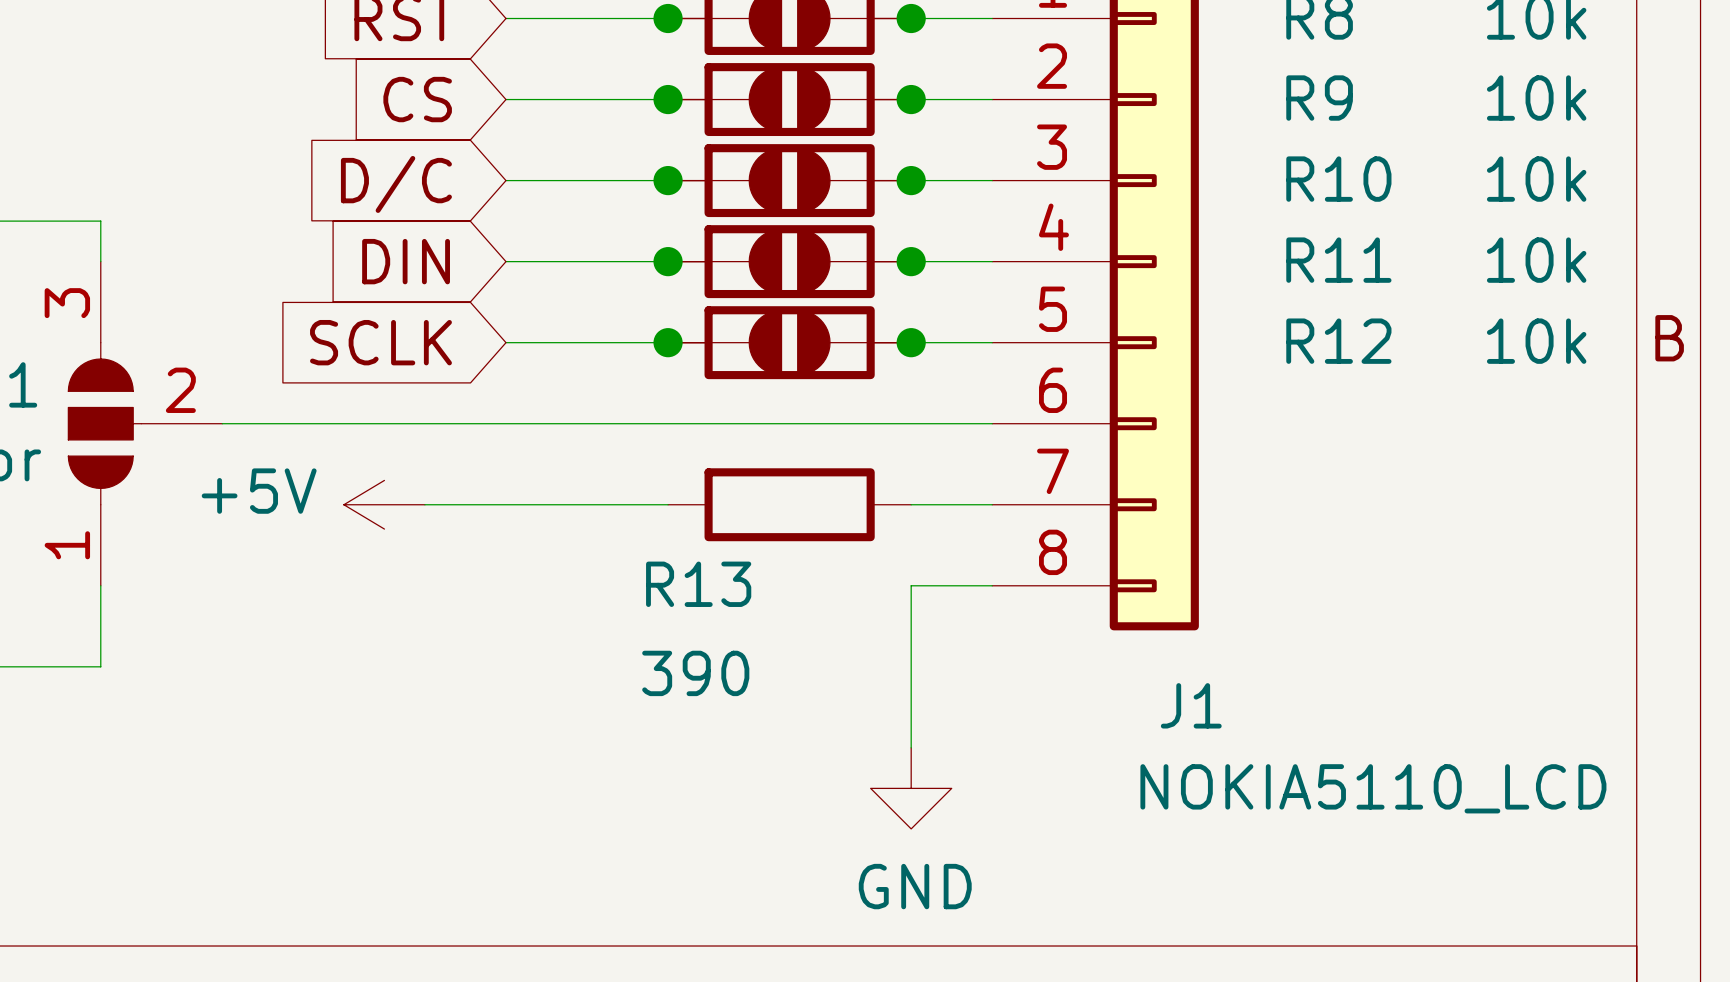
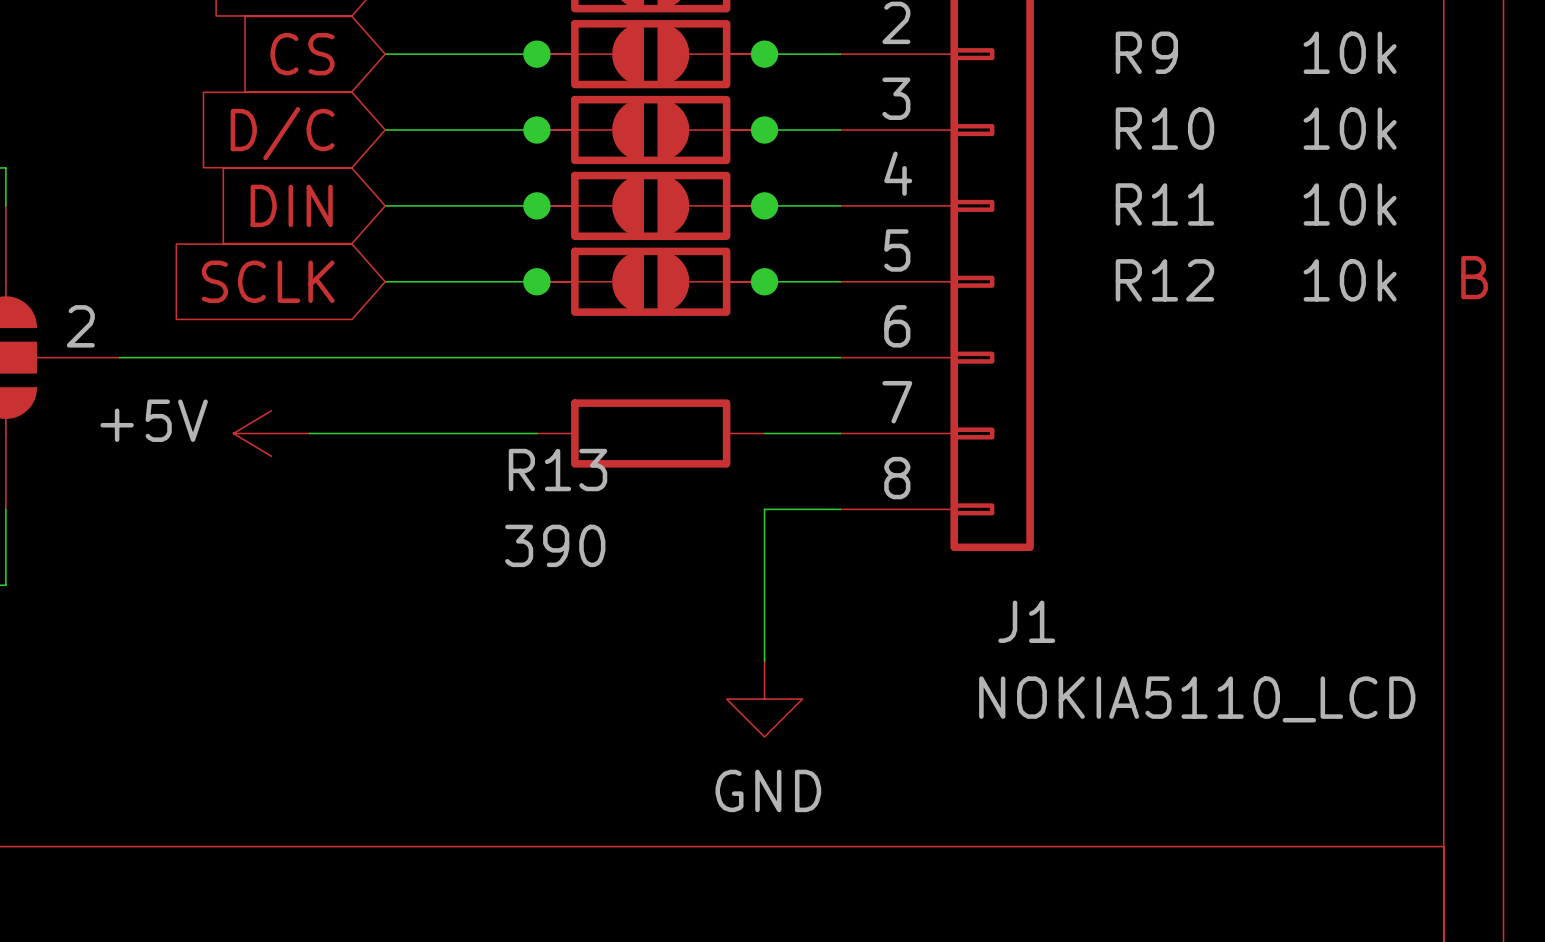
R13 name position: R13 (698, 584) -> R13 (558, 470)
R13 value position: 390 (695, 673) -> 390 (555, 545)

